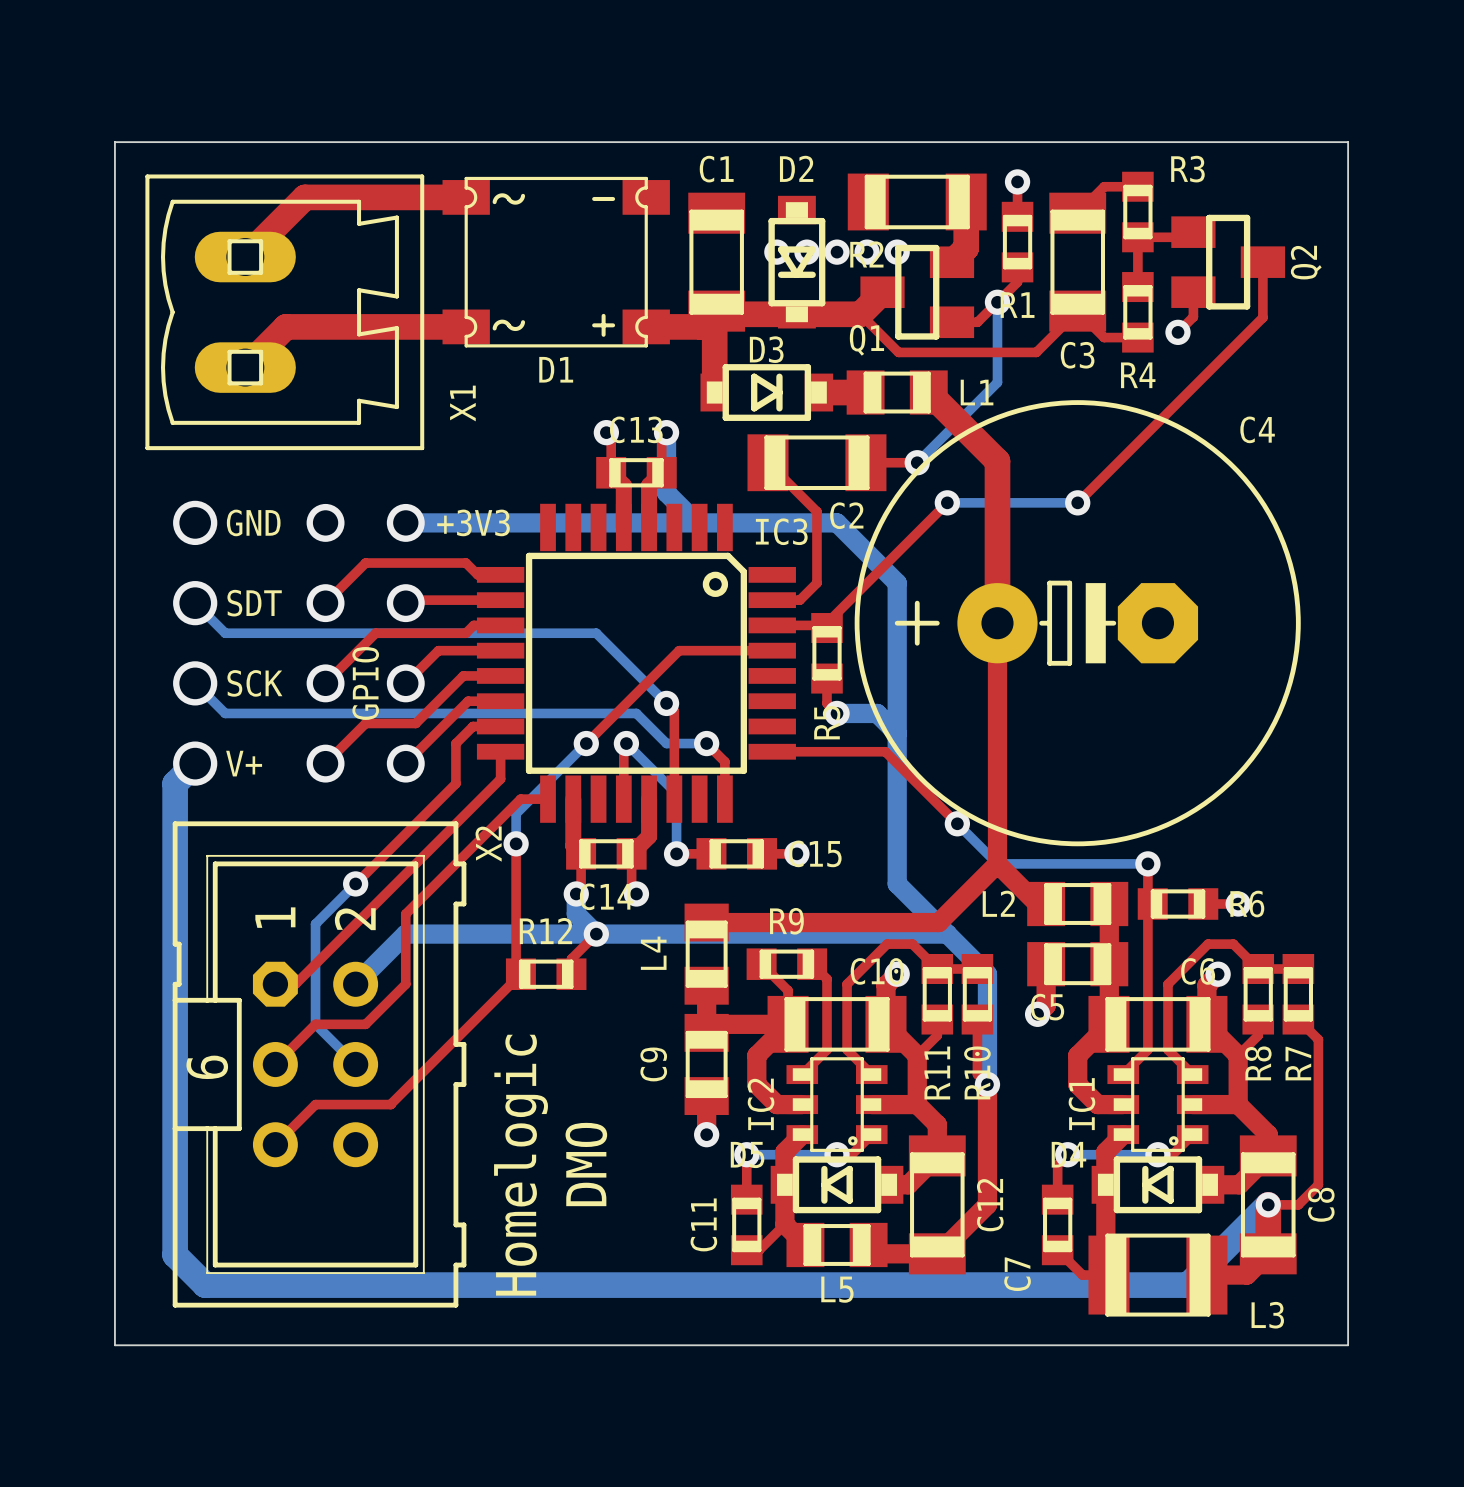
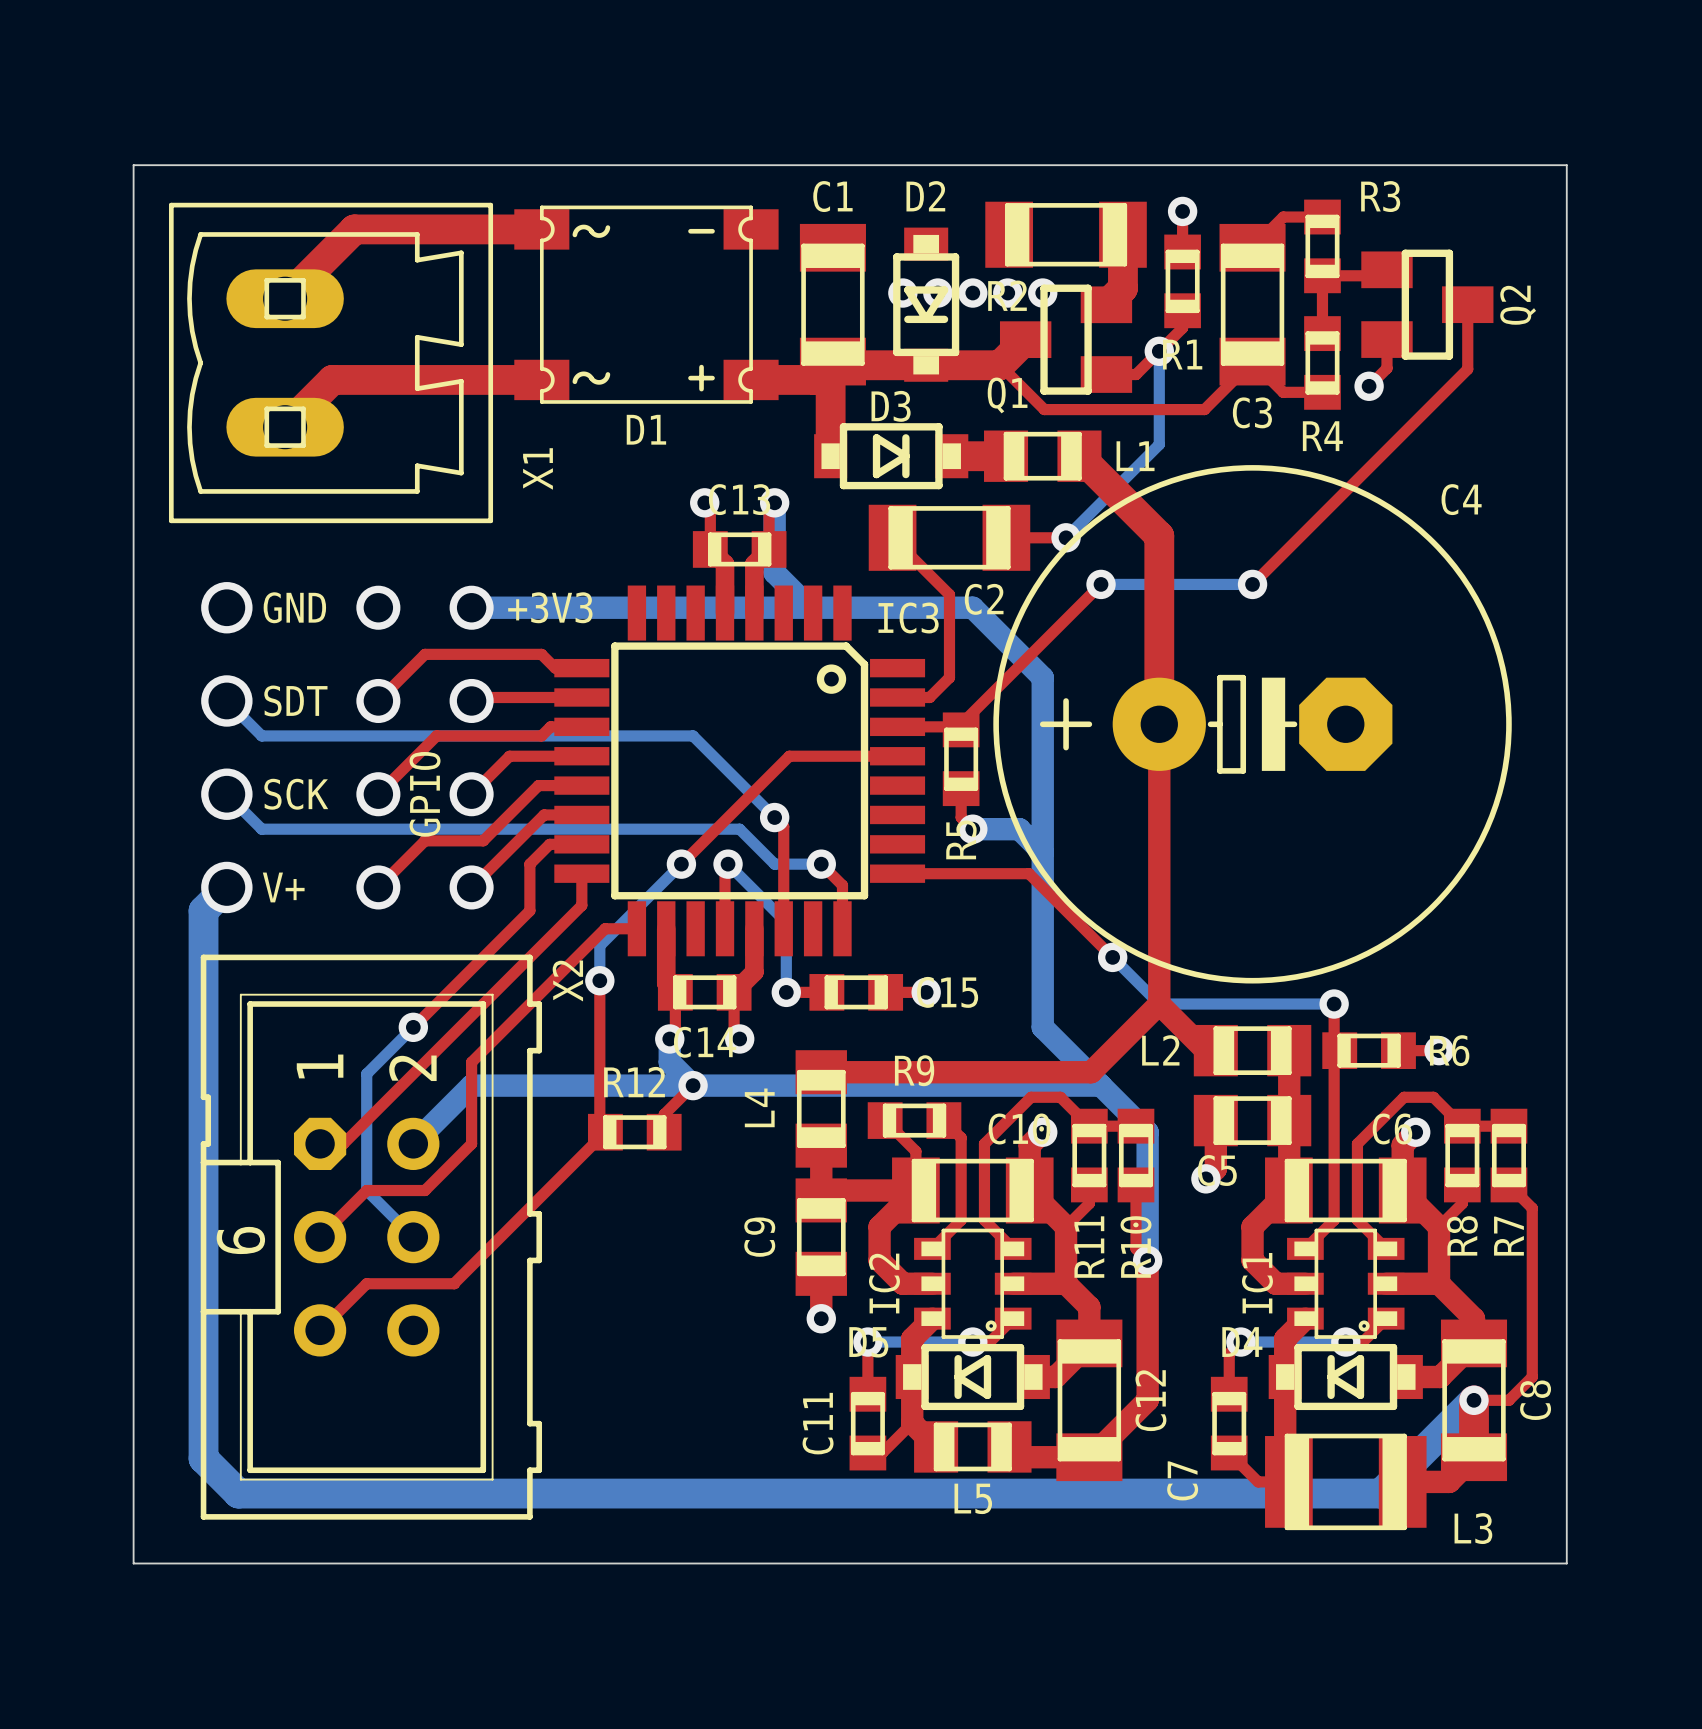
text: DMO (586, 1164) -> none
text: Homelogic (521, 1165) -> none

